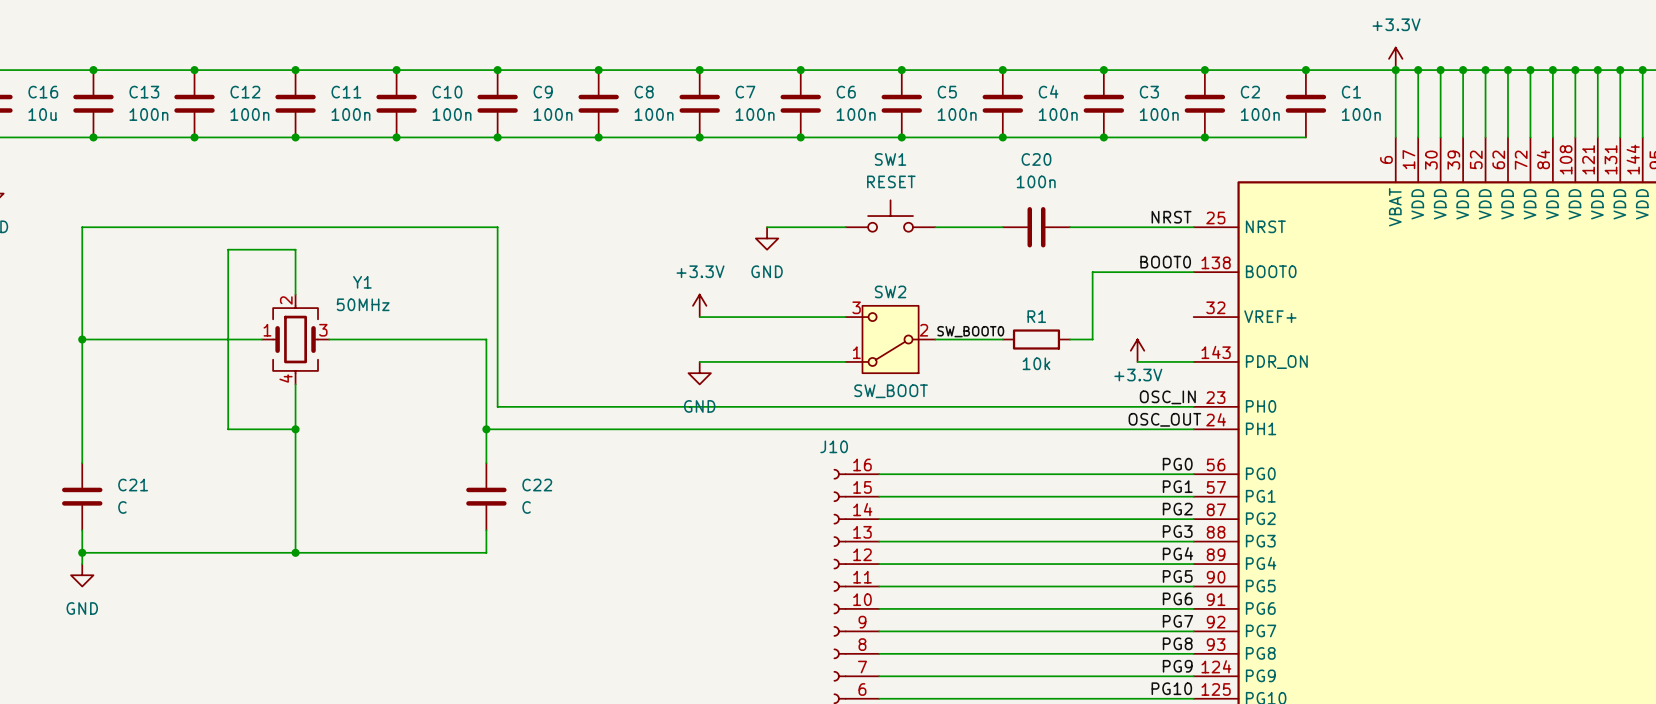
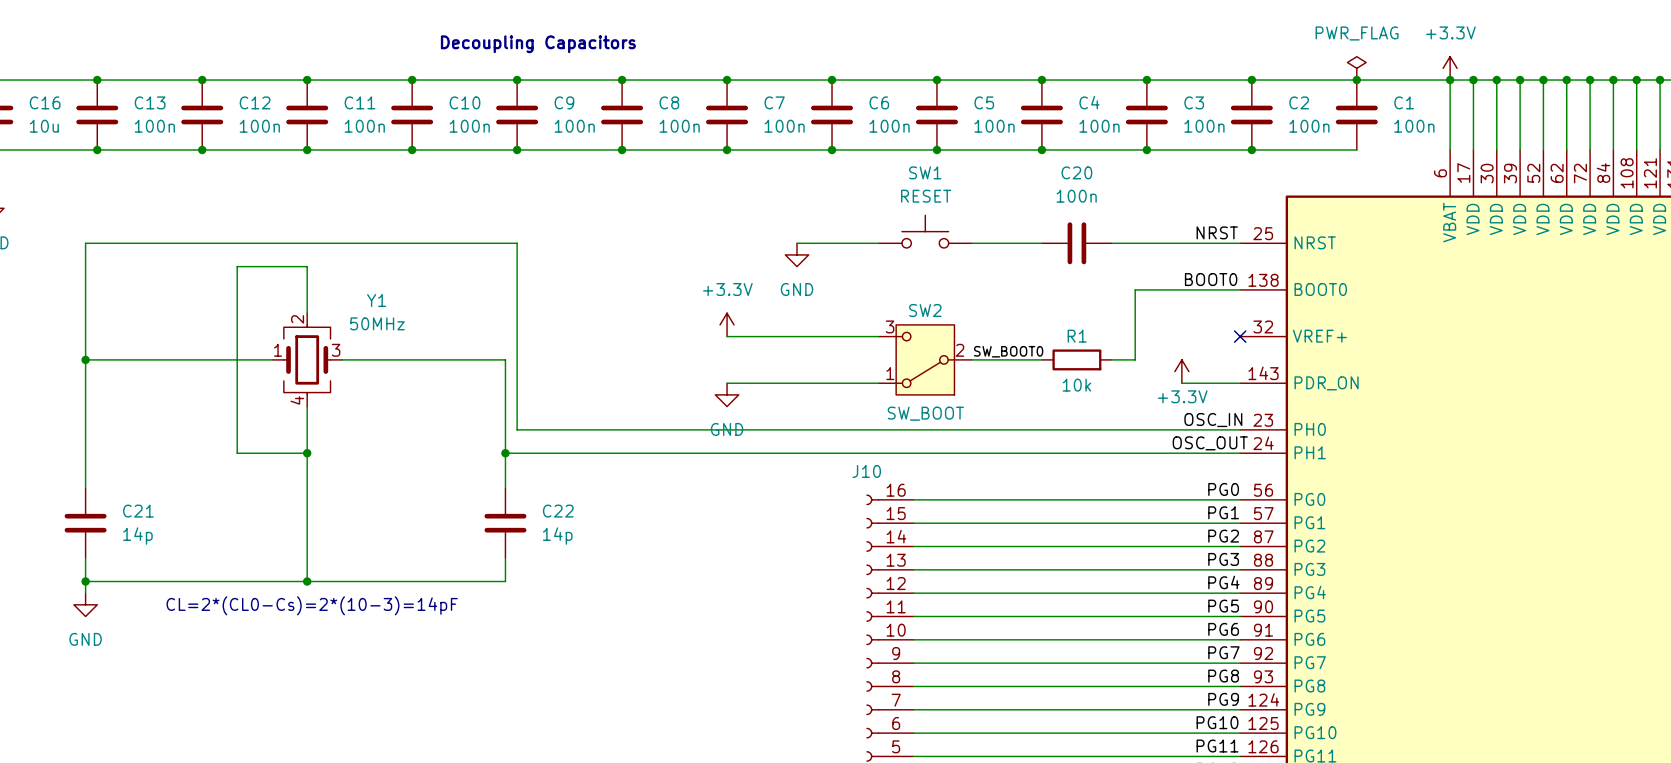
text: none -> Decoupling Capacitors (538, 44)
power symbol: none -> PWR_FLAG (1356, 68)
no-connect mark: none -> (1240, 336)
C21 value: C (122, 507) -> 14p (137, 536)
C22 value: C (526, 507) -> 14p (557, 536)
text: none -> CL=2*(CL0-Cs)=2*(10-3)=14pF (312, 605)

